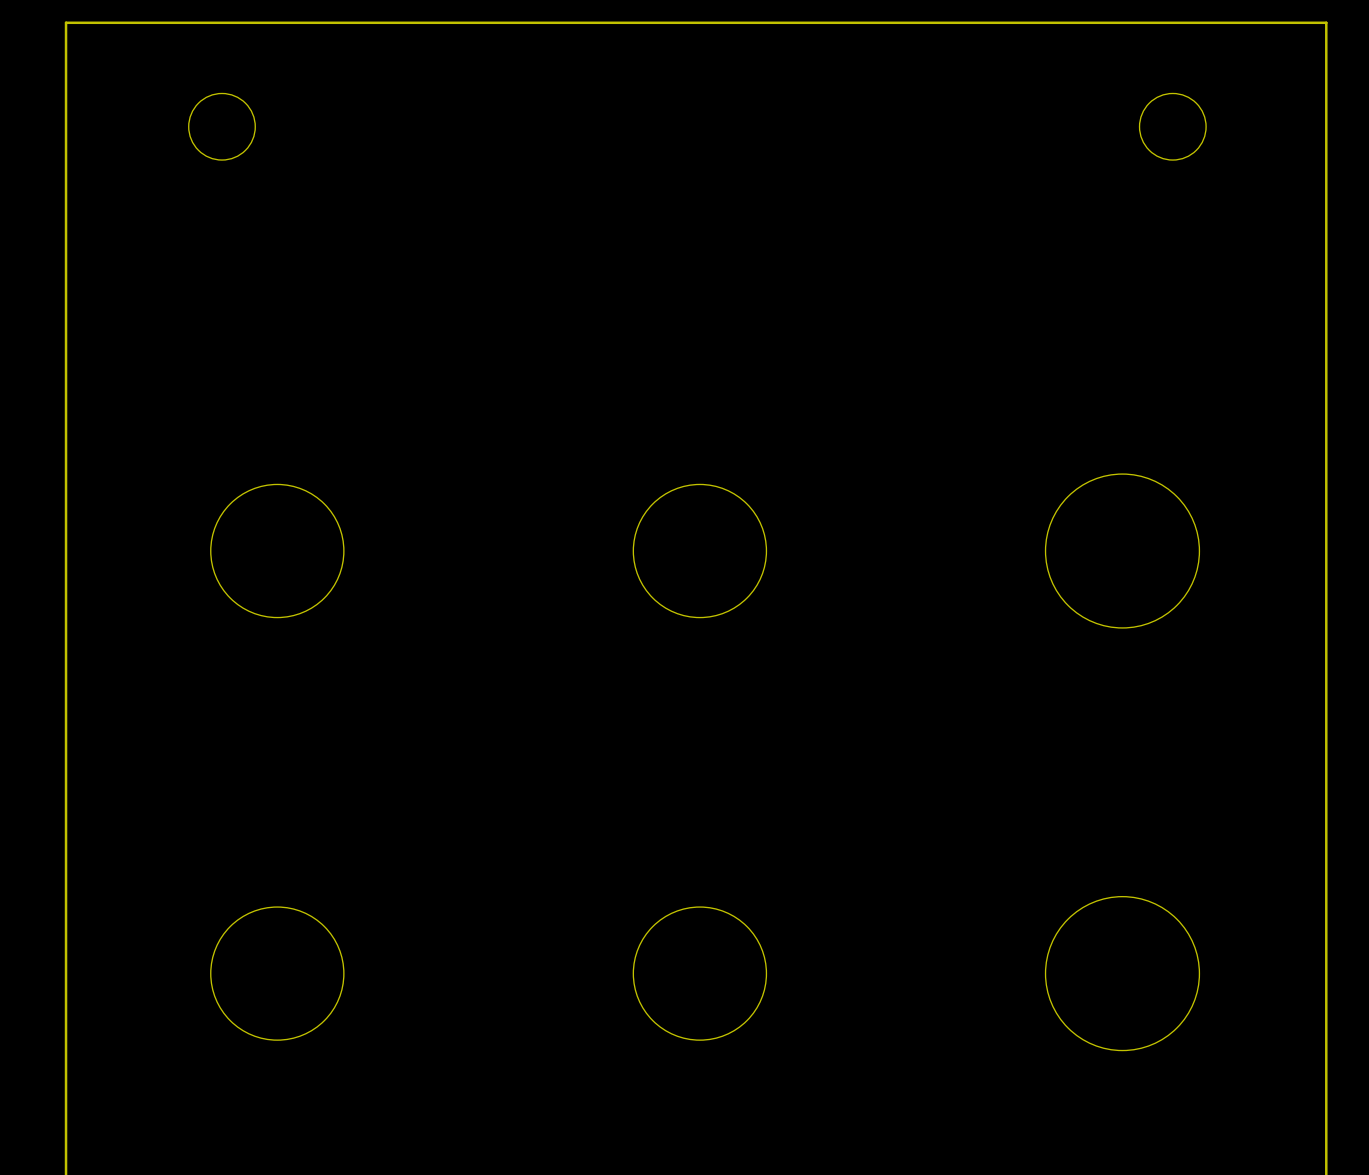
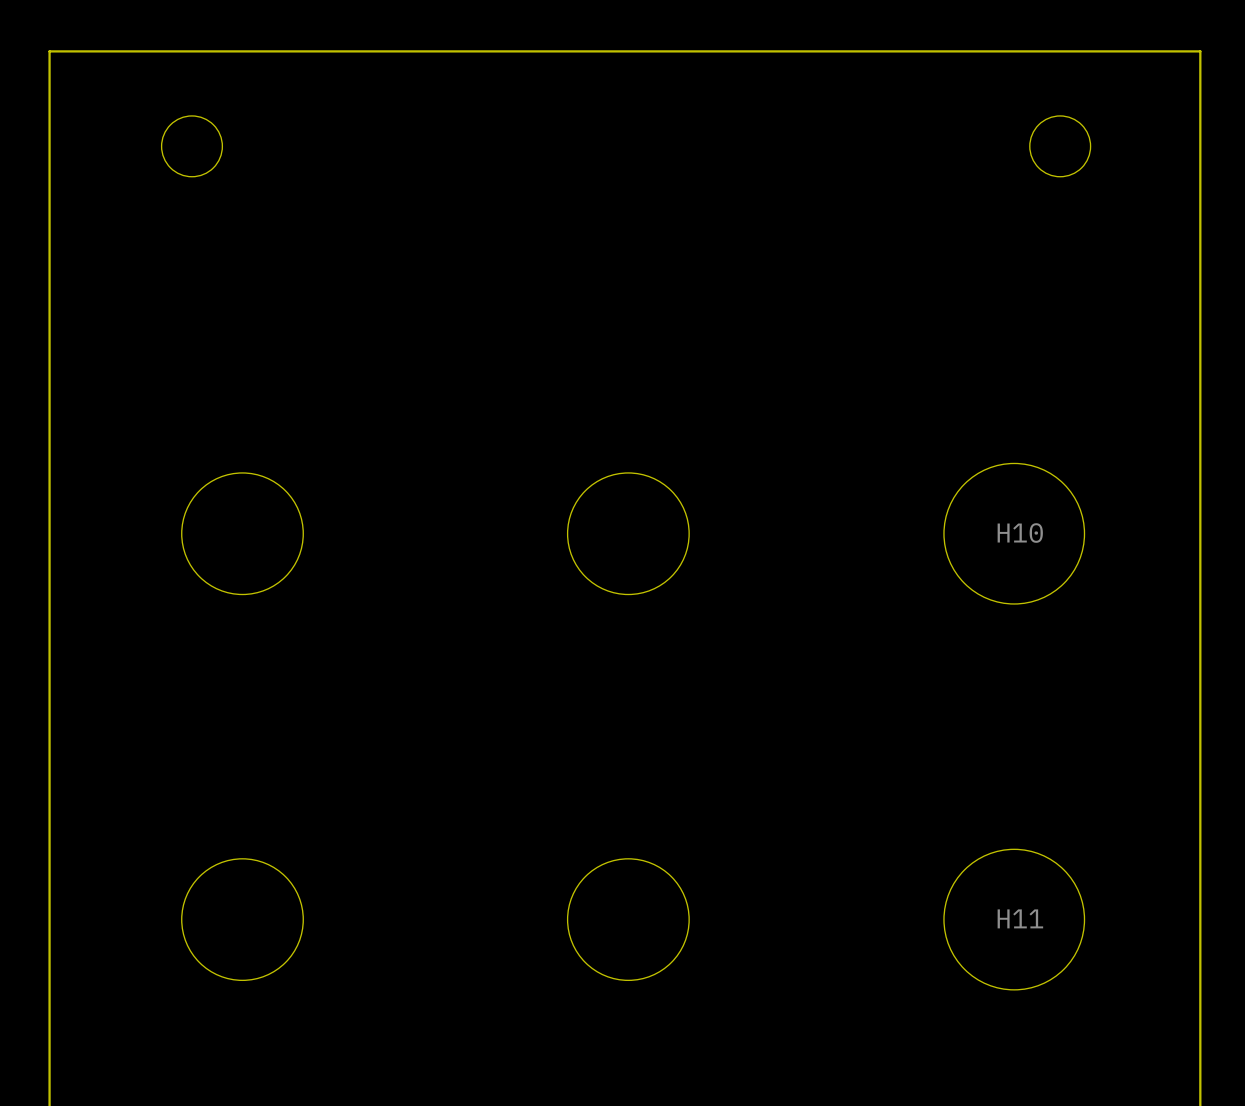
H10 name: none -> H10 (1020, 533)
H11 name: none -> H11 (1020, 918)

